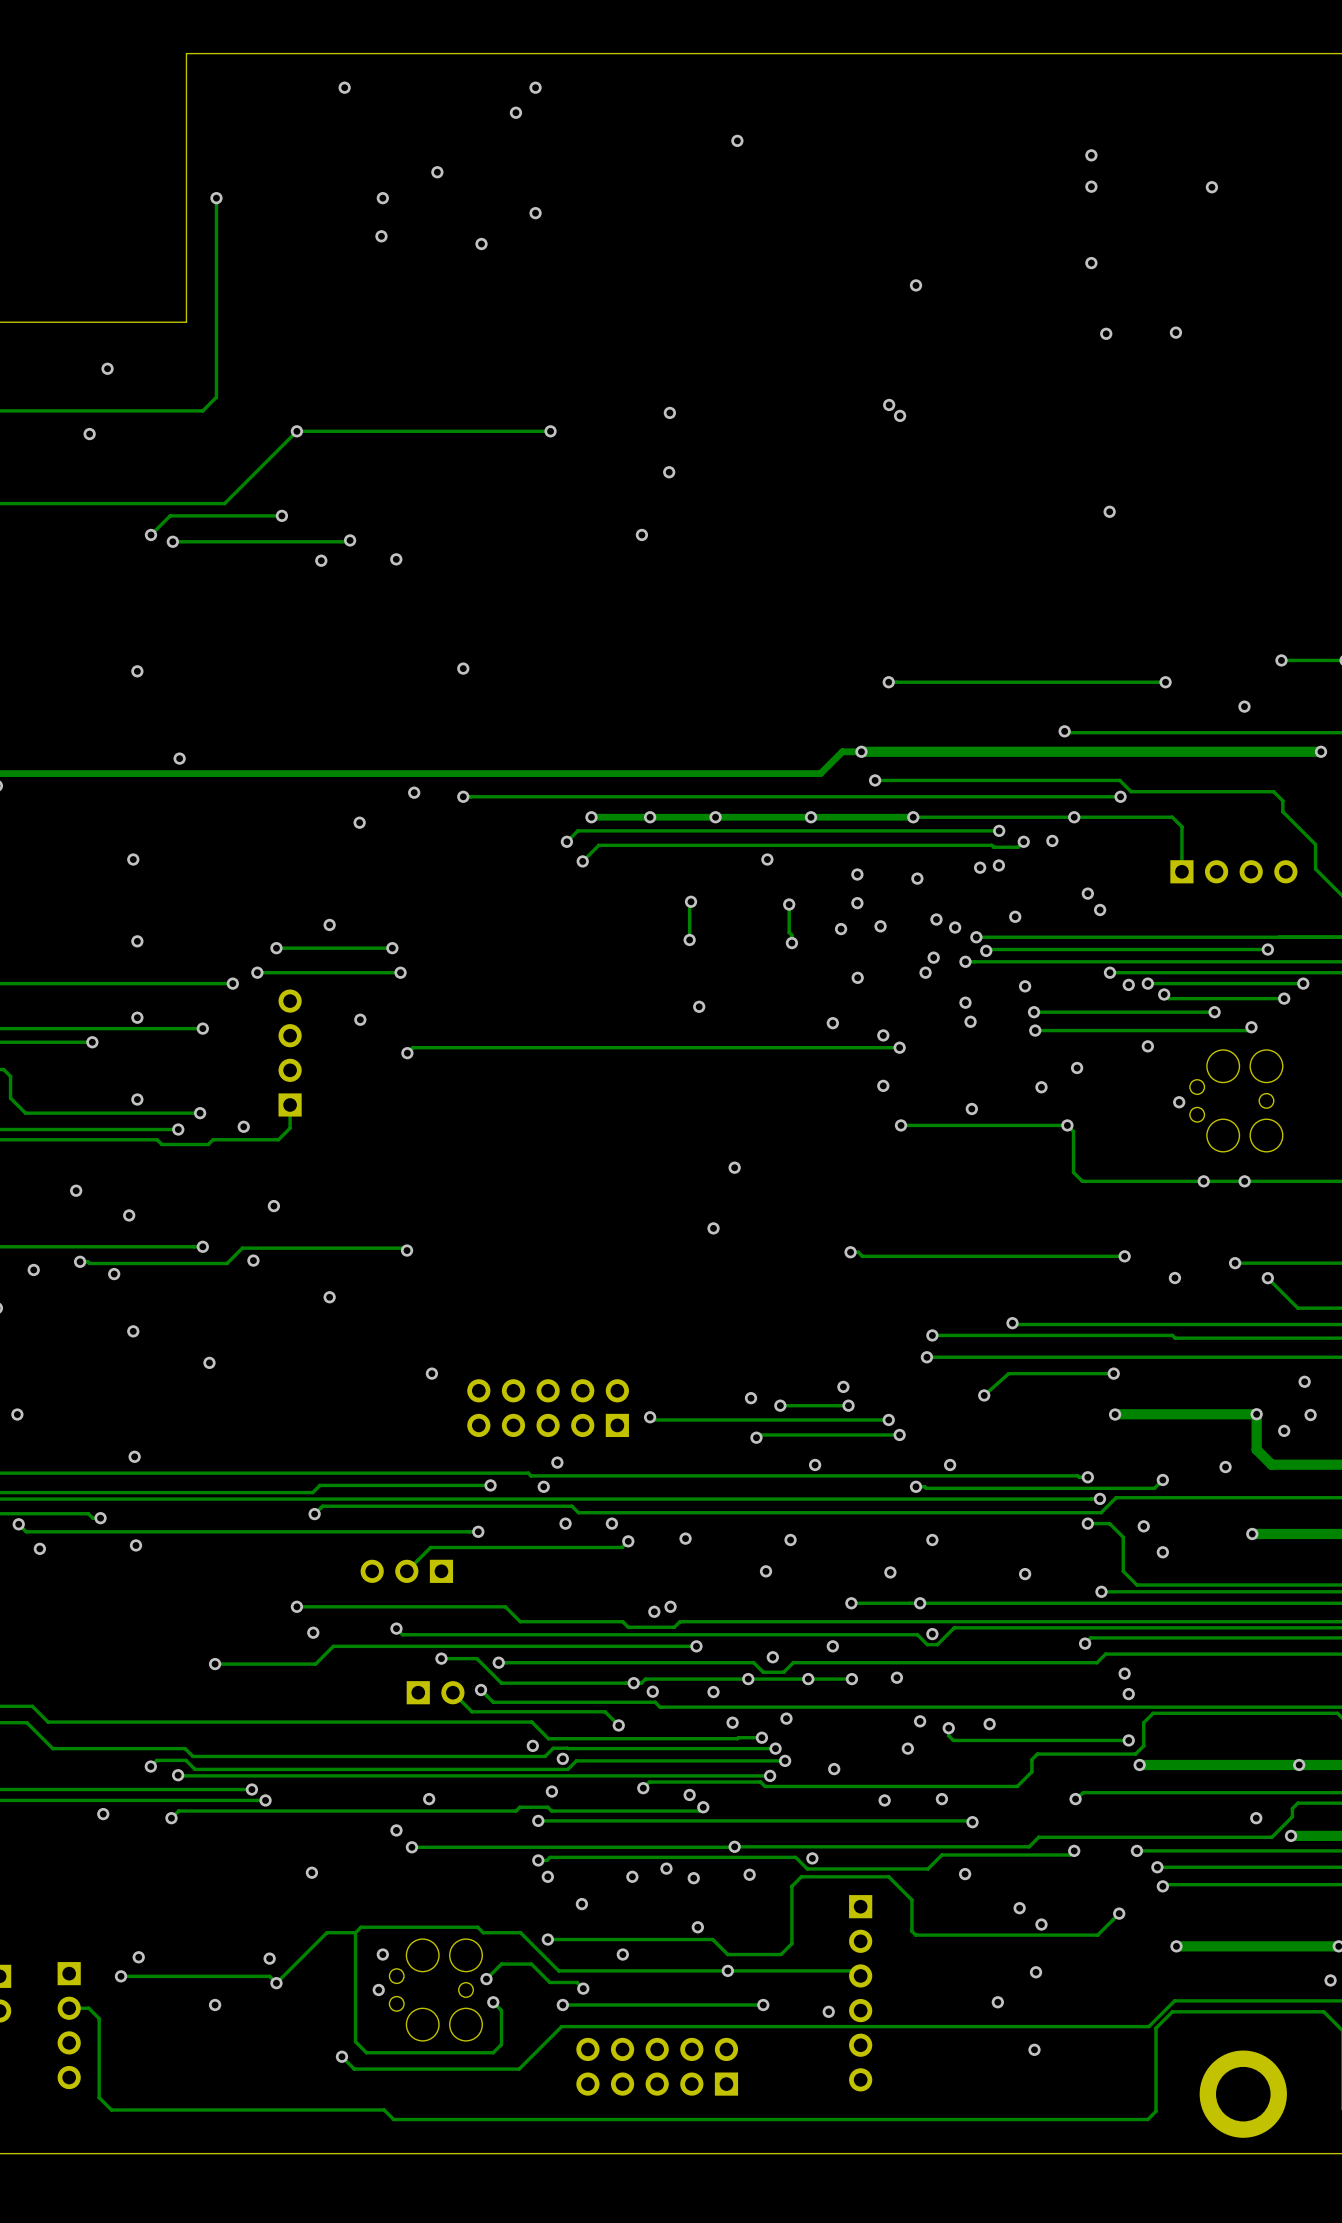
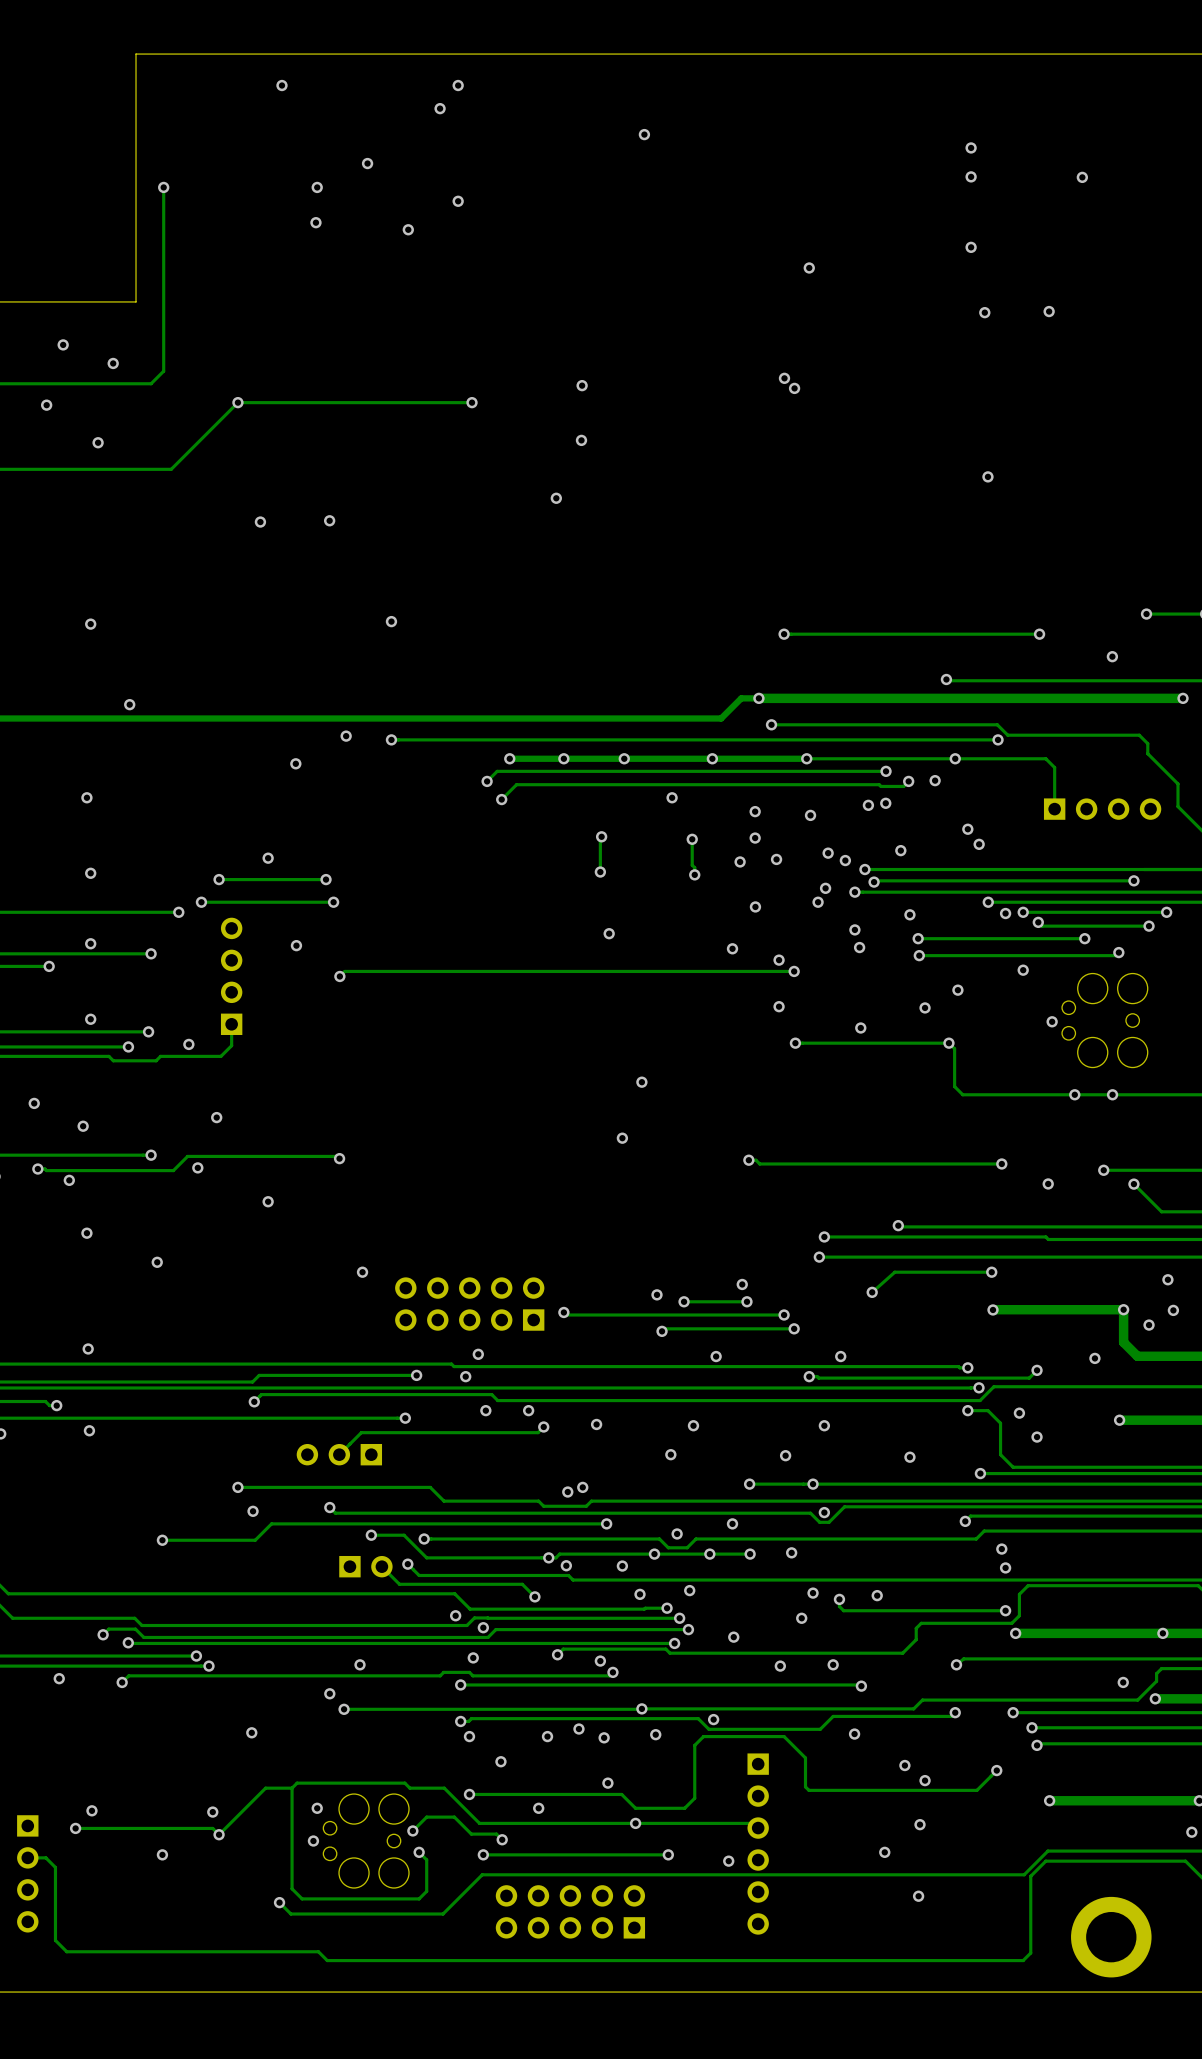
via: none -> (113, 363)
via: none -> (98, 442)
track: (281, 515) (170, 515) (151, 534) -> none
via: (281, 515) -> none
via: (151, 534) -> none
track: (350, 540) (172, 541) -> none
via: (350, 540) -> none
via: (172, 541) -> none

